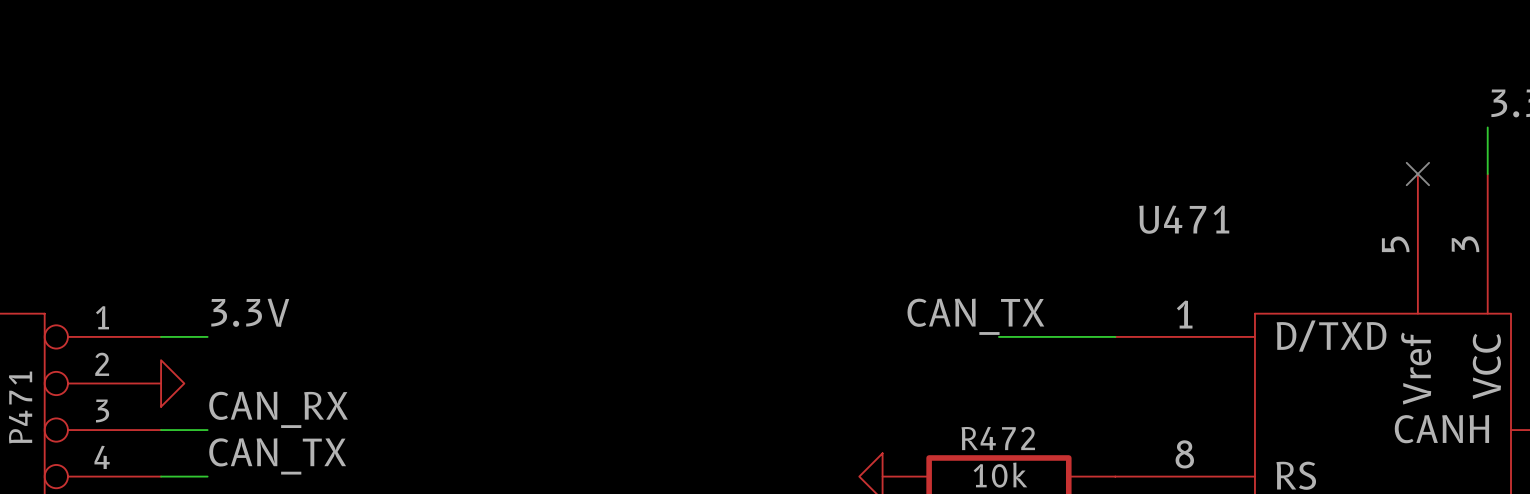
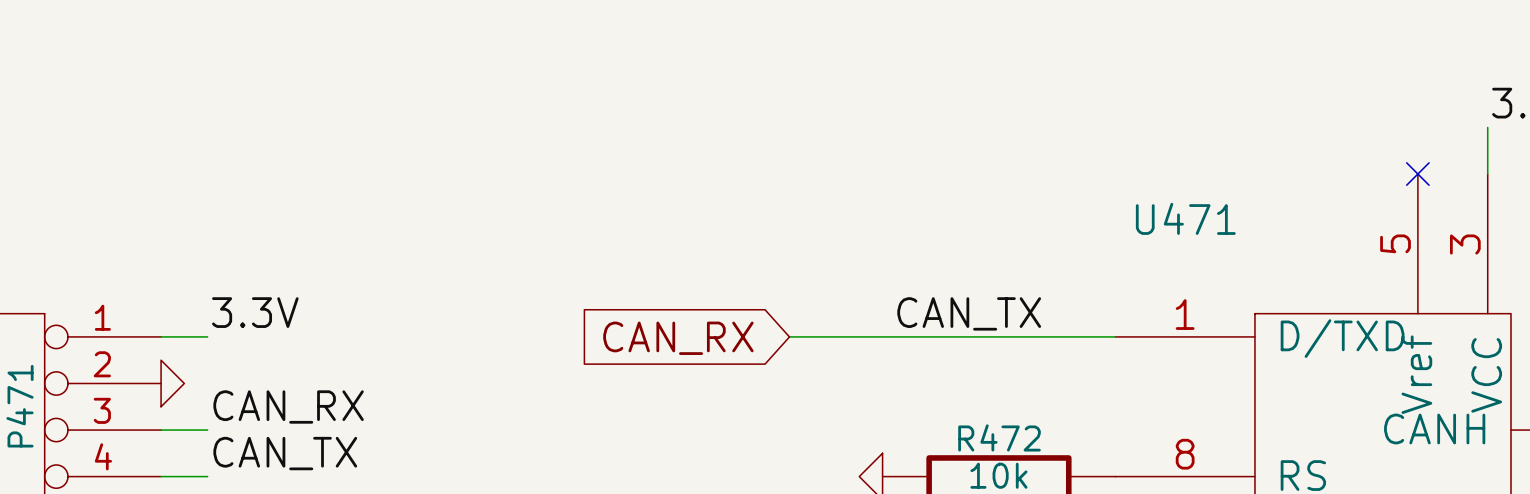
wire: none -> (789, 336) (998, 336)
global label: none -> CAN_RX (678, 338)

